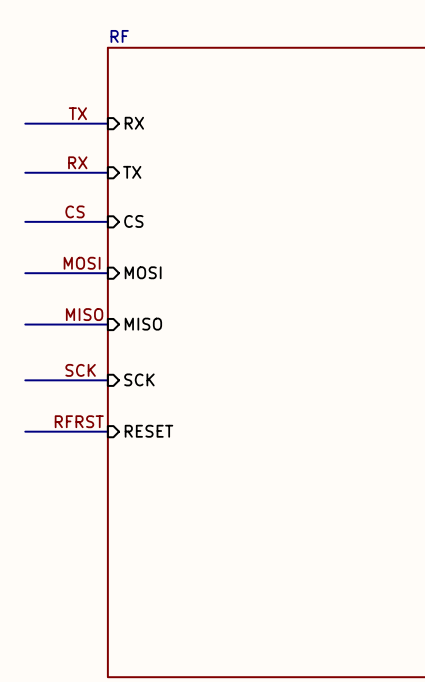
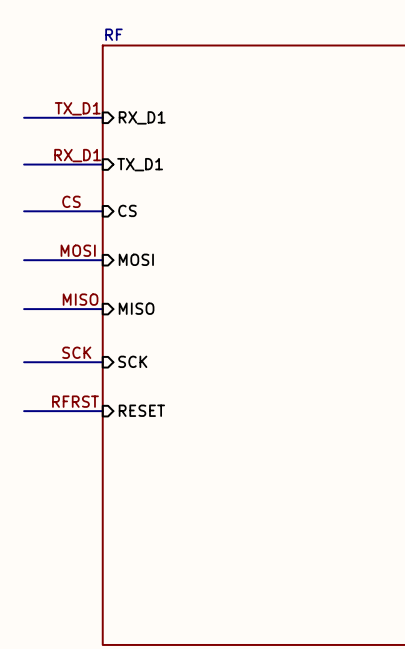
label: TX (77, 113) -> none
label: none -> TX_D1 (77, 108)
sheet pin: RX (134, 123) -> RX_D1 (142, 117)
label: RX (77, 162) -> none
label: none -> RX_D1 (77, 155)
sheet pin: TX (132, 172) -> TX_D1 (140, 164)

